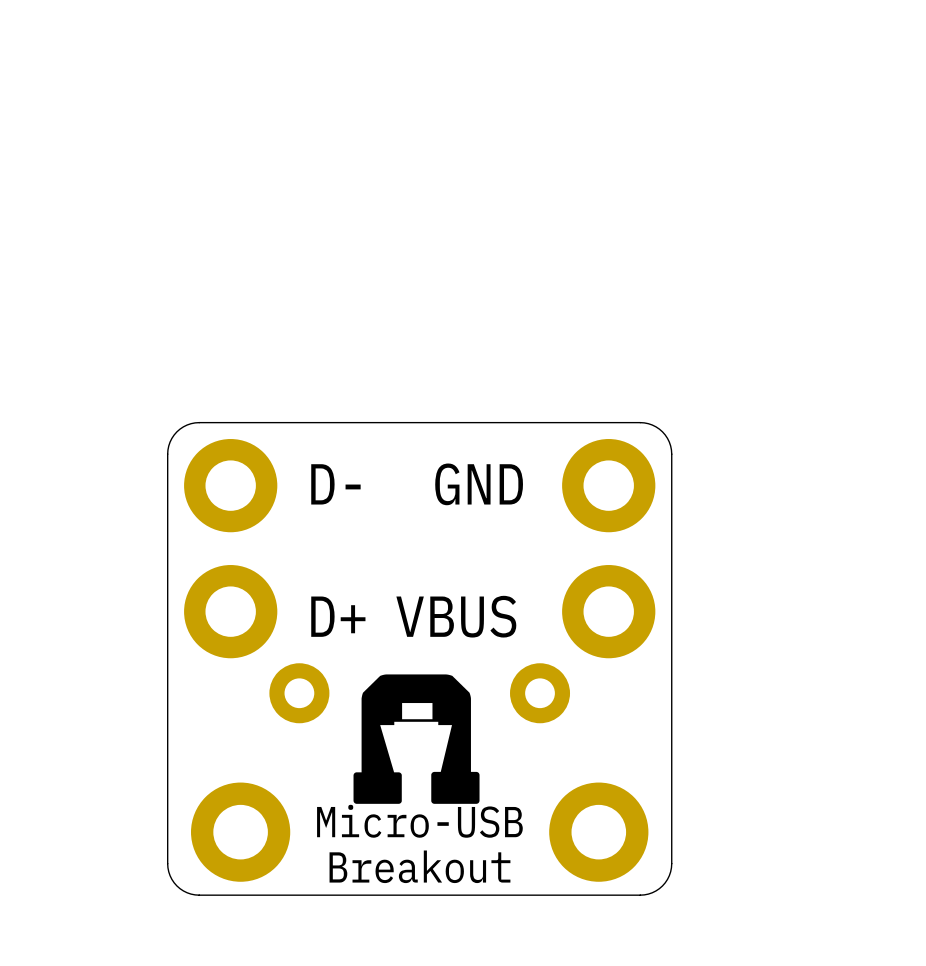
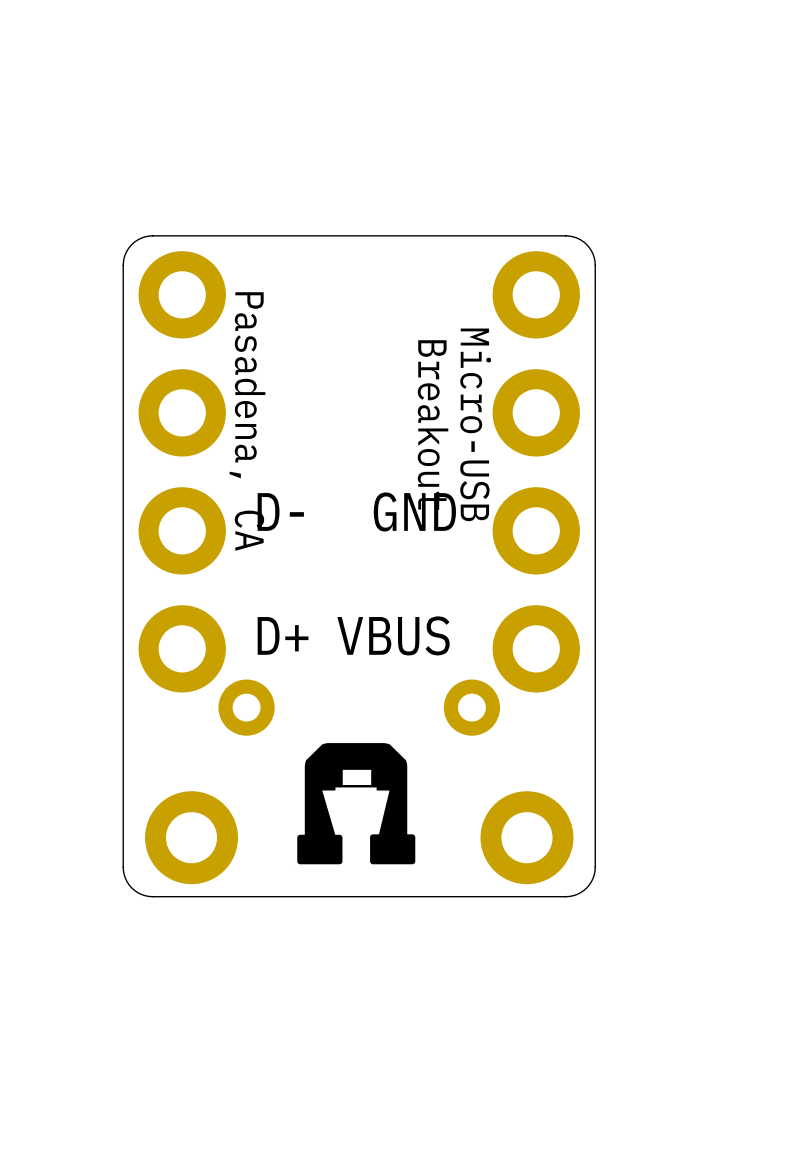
text: none -> Pasadena, CA (247, 421)
part: none -> (182, 471)
part: none -> (536, 471)
board edge: (671, 454) (669, 442) (662, 431) (652, 425) (640, 422) (195, 422) (183, 426) (174, 434) (168, 445) (167, 454) -> (595, 483) (595, 261) (591, 250) (583, 241) (573, 236) (565, 235) (152, 235) (137, 239) (127, 250) (123, 265) (123, 483)
part: (230, 548) -> none
part: (608, 548) -> none
drawing position: (416, 739) -> (356, 803)
text rotation: 0° (419, 821) -> 90° clockwise (475, 424)
text position: Micro-USB (419, 821) -> Micro-USB (475, 424)
text rotation: 0° (419, 866) -> 90° clockwise (433, 424)
text position: Breakout (419, 866) -> Breakout (433, 424)

